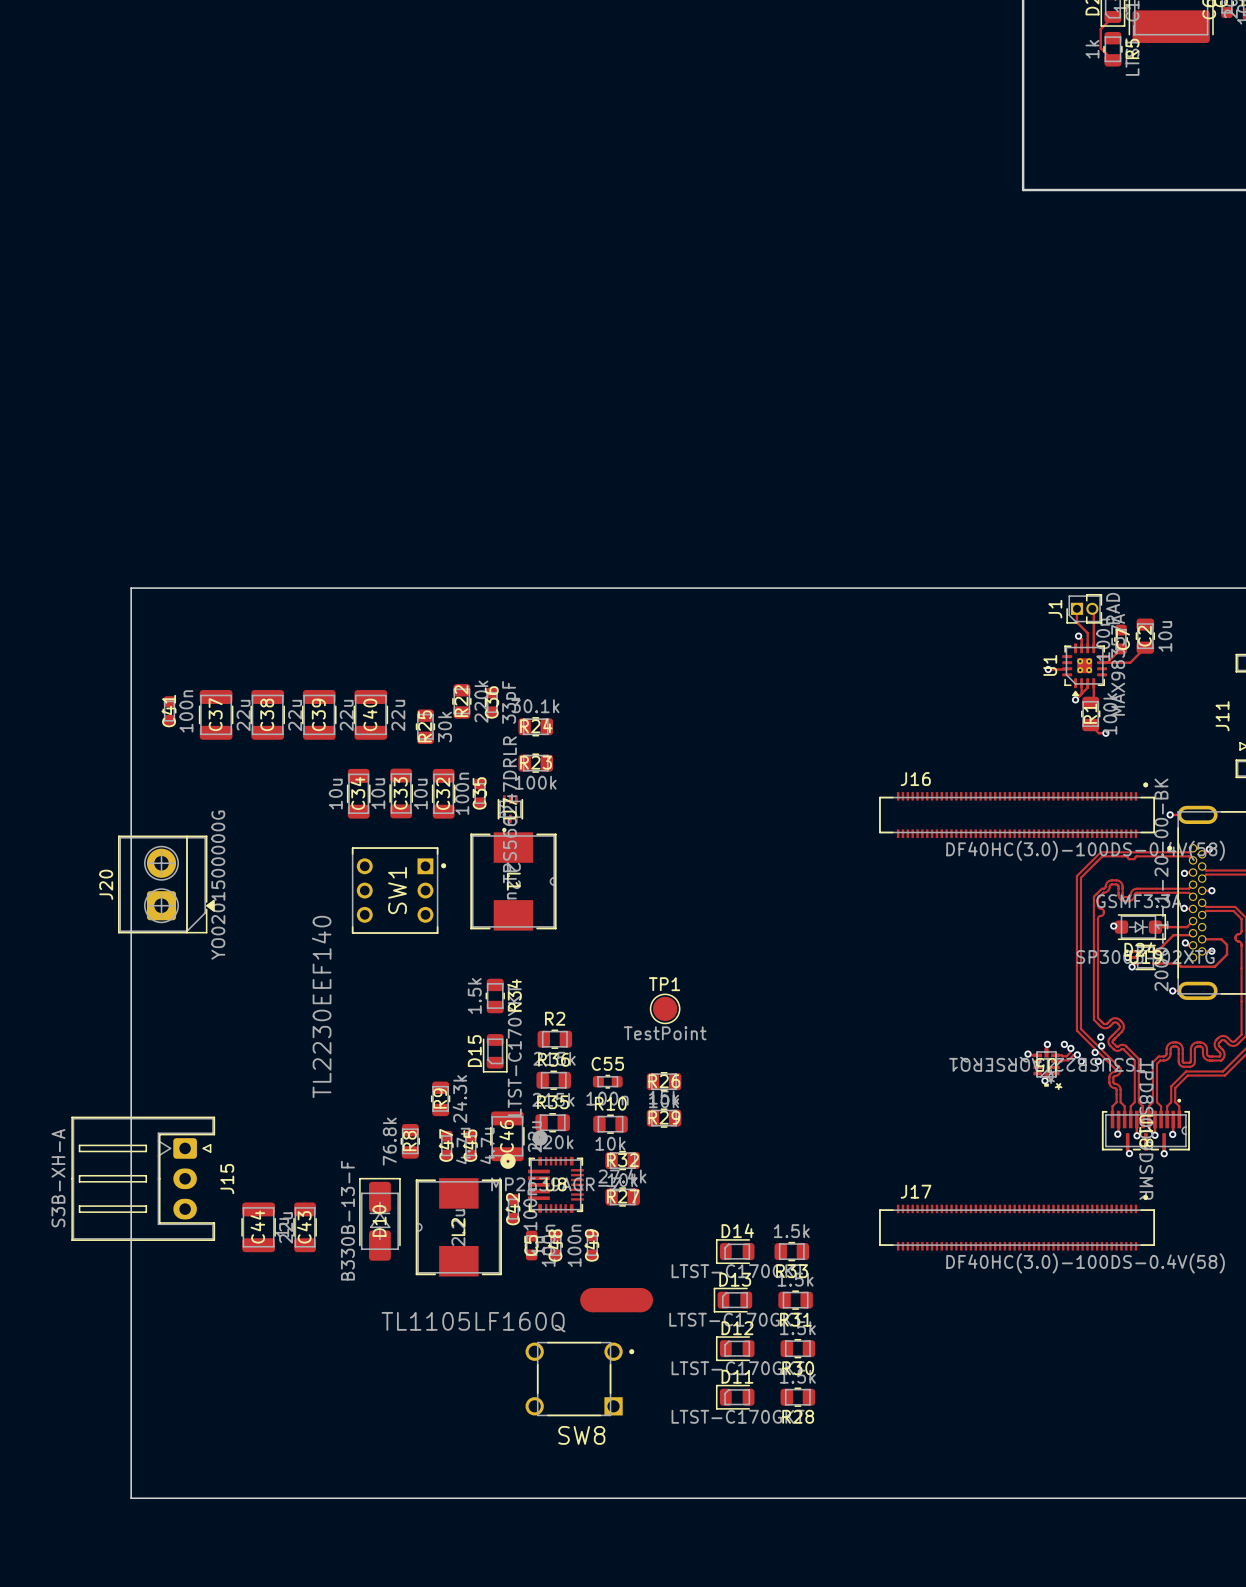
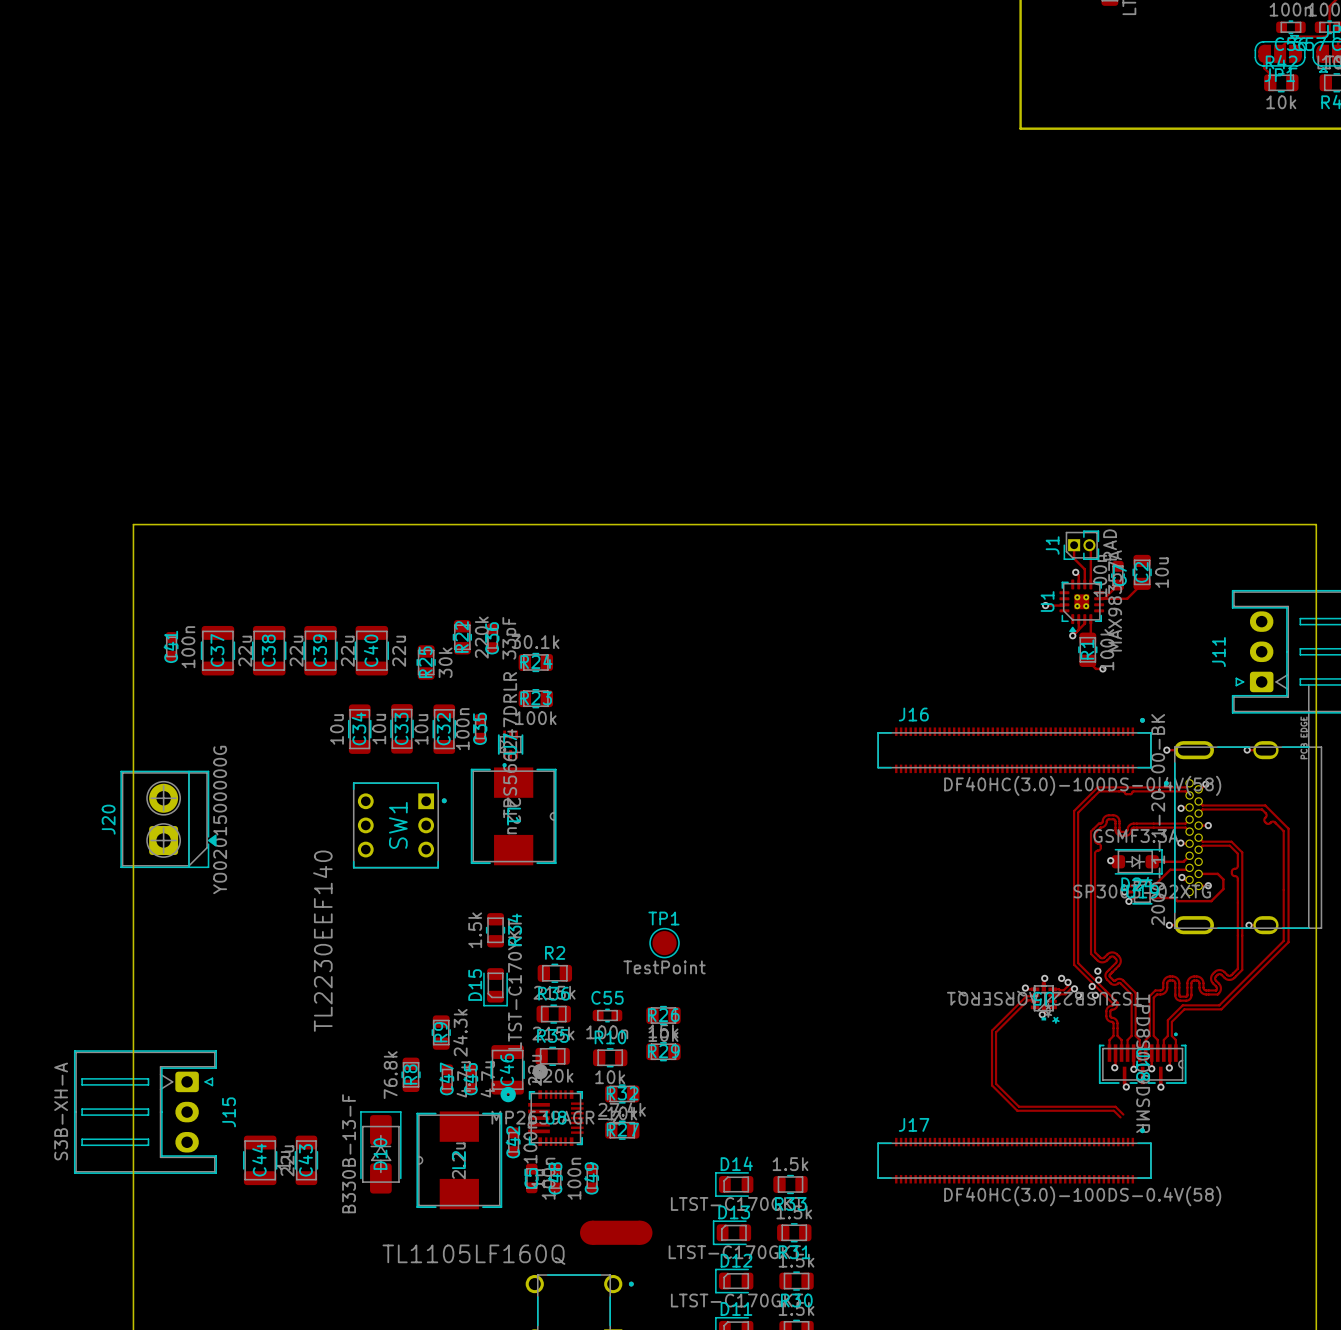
track: none -> (1035, 995) (1026, 996) (992, 1030) (992, 1085) (1017, 1110) (1113, 1110) (1120, 1117)
track: none -> (1035, 1001) (1028, 1000) (996, 1032) (996, 1083) (1019, 1106) (1115, 1106) (1123, 1114)

